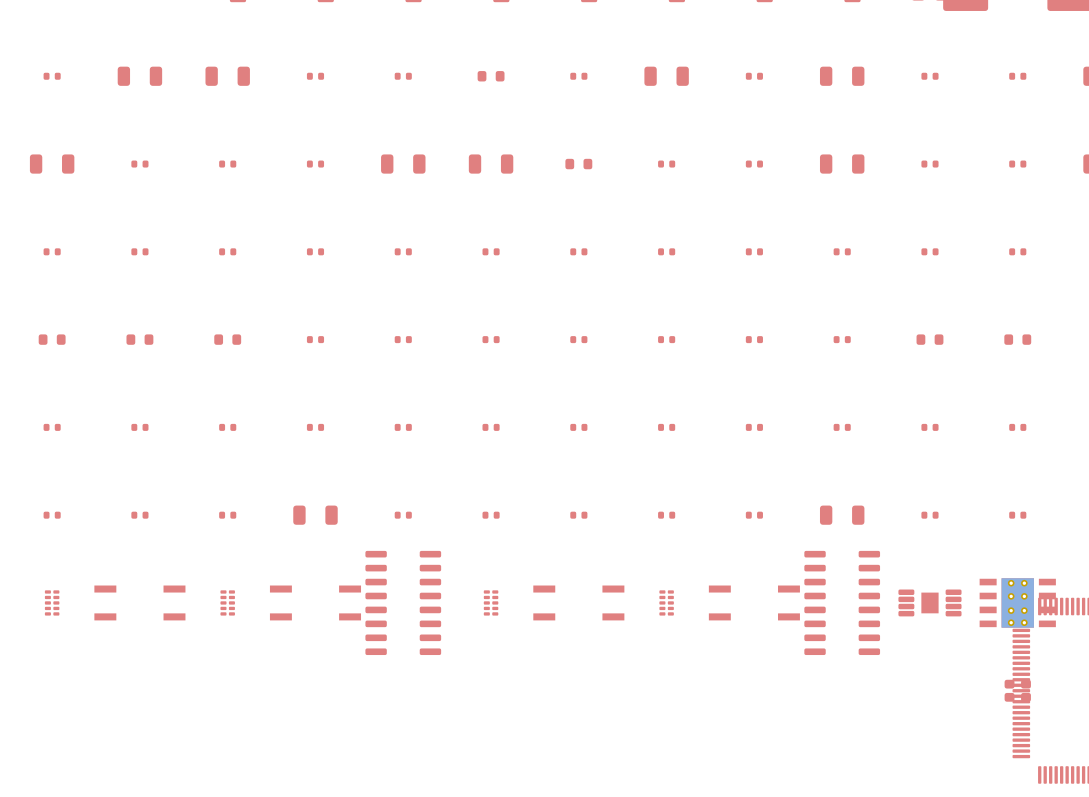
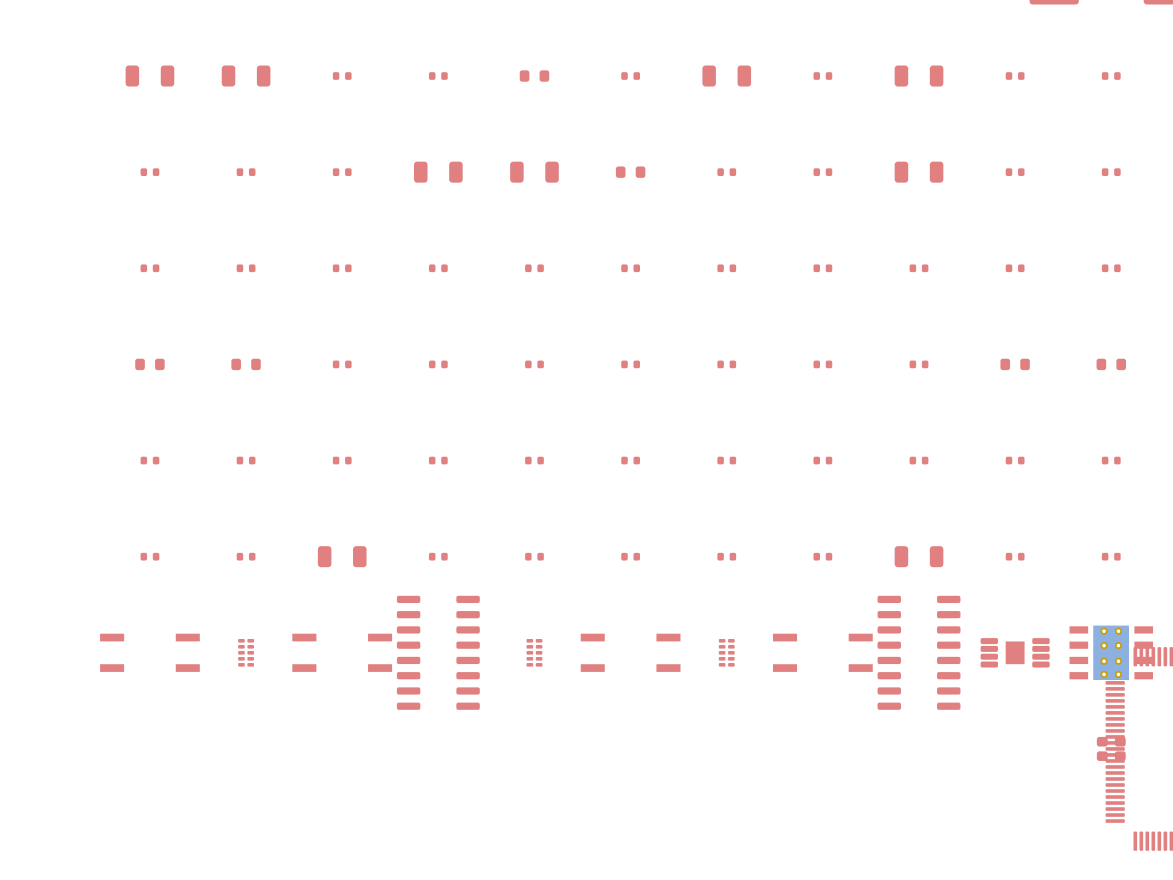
part: (52, 76) -> none
part: (52, 164) -> none
part: (52, 251) -> none
part: (52, 339) -> none
part: (52, 427) -> none
part: (52, 515) -> none
part: (52, 602) -> none

